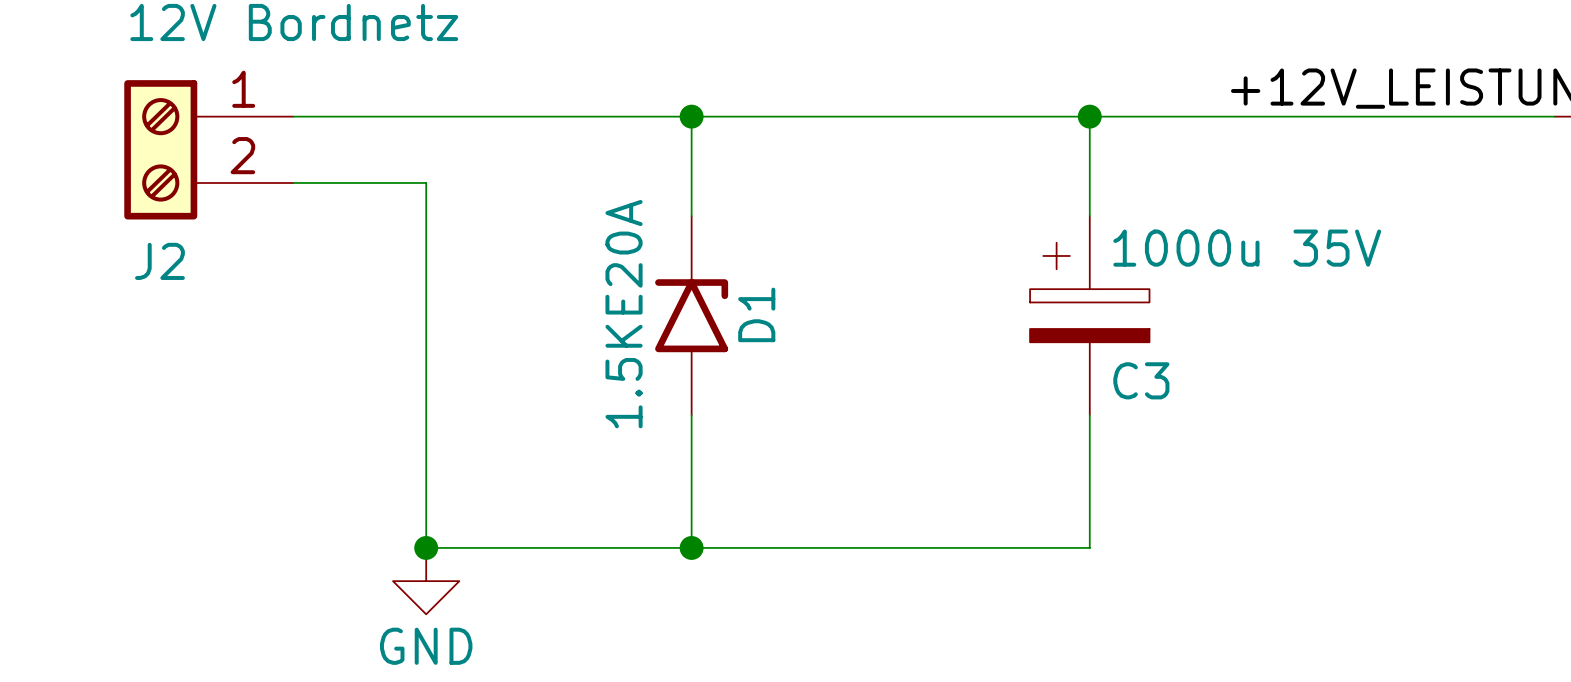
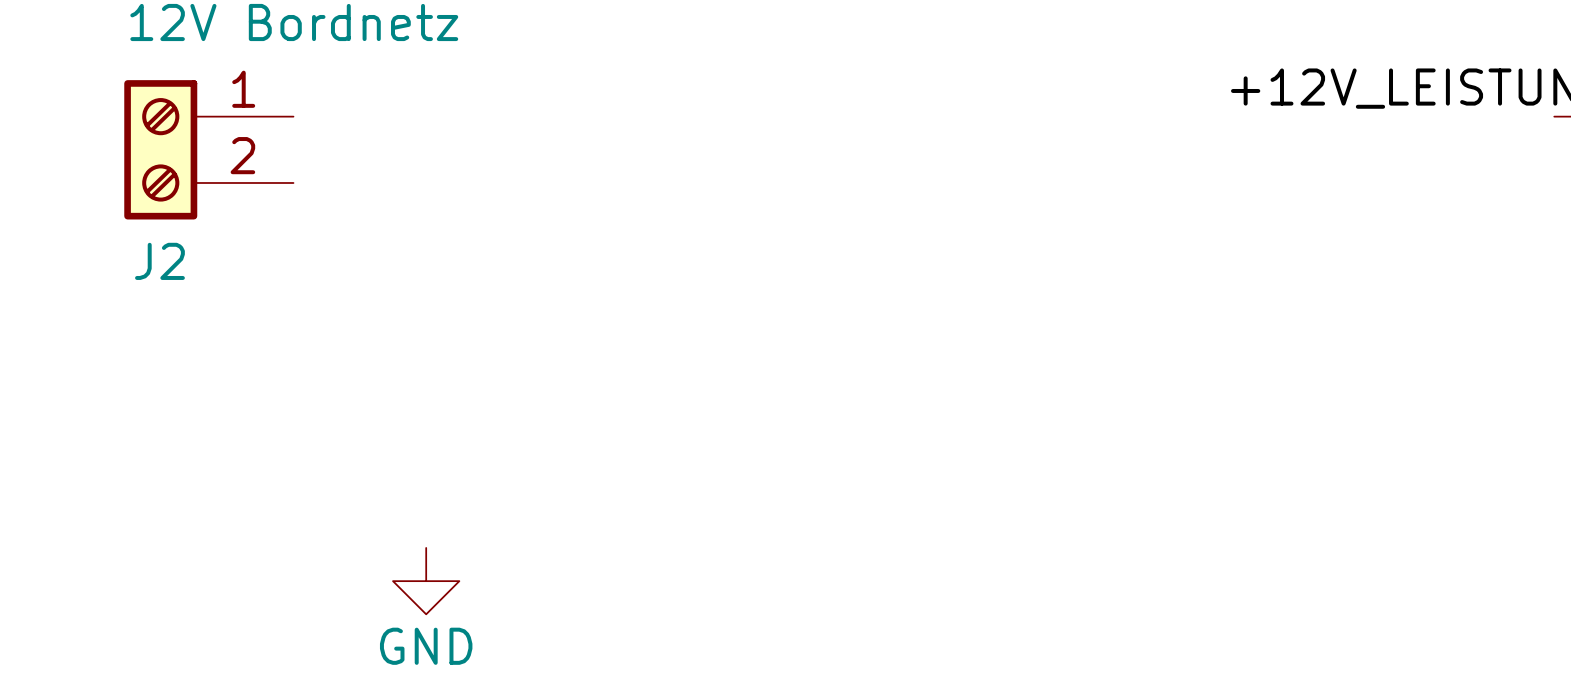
wire: (293, 116) (1554, 116) -> none
wire: (691, 116) (691, 216) -> none
junction: (691, 116) -> none
wire: (1089, 116) (1089, 216) -> none
junction: (1089, 116) -> none
wire: (293, 182) (426, 182) (426, 547) (1089, 547) (1089, 415) -> none
D1: 1.5KE20A (691, 315) -> none
C3: 1000u 35V (1089, 315) -> none
wire: (691, 415) (691, 547) -> none
junction: (426, 547) -> none
junction: (691, 547) -> none

